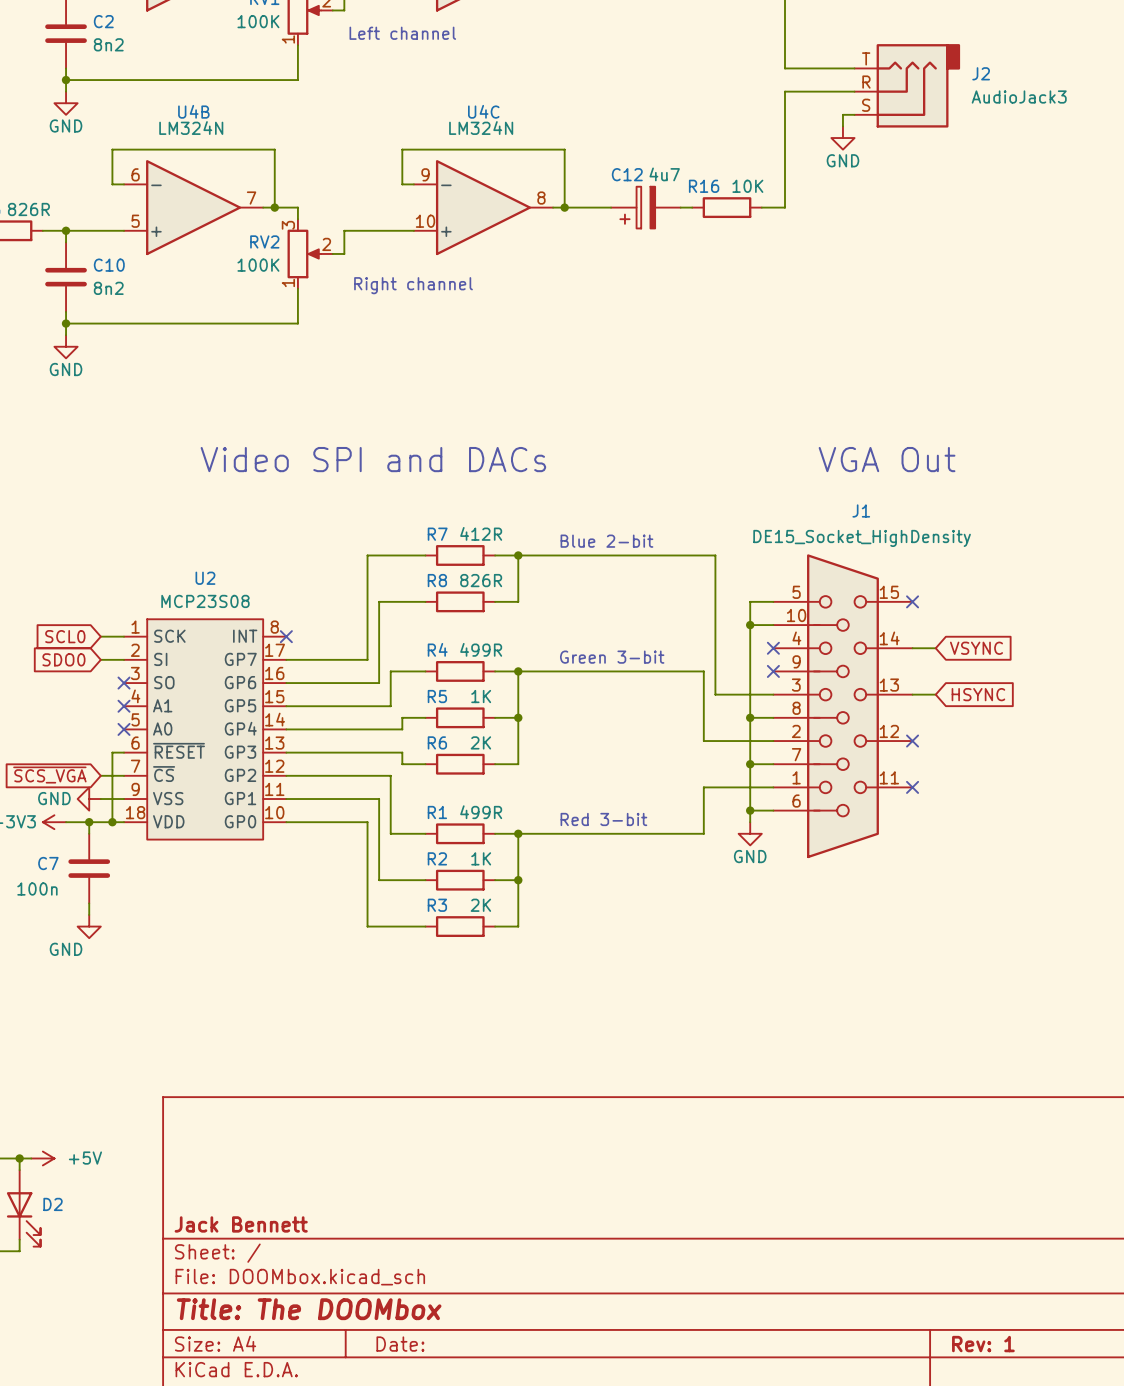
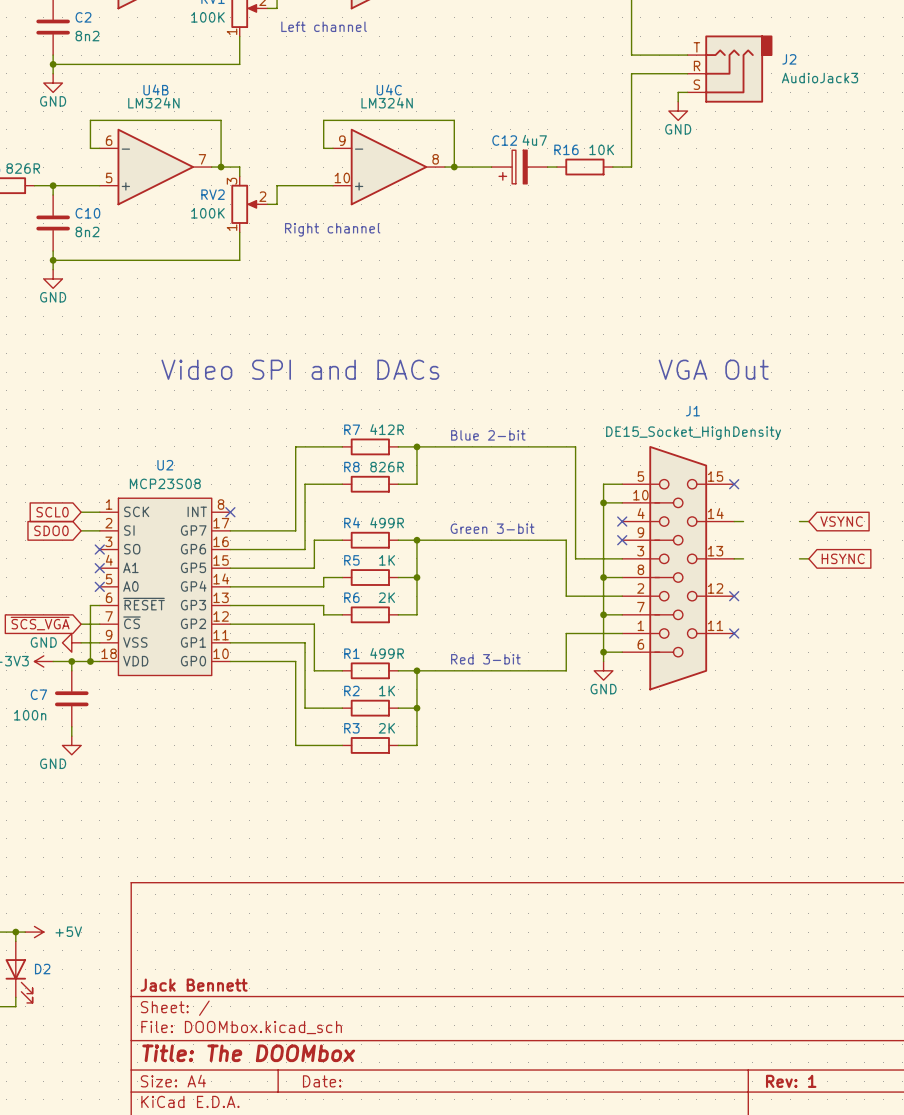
wire: (924, 648) (935, 648) -> (799, 521) (808, 521)
global label position: VSYNC (976, 648) -> VSYNC (841, 521)
wire: (924, 694) (935, 694) -> (799, 558) (808, 558)
global label position: HSYNC (978, 694) -> HSYNC (843, 558)

